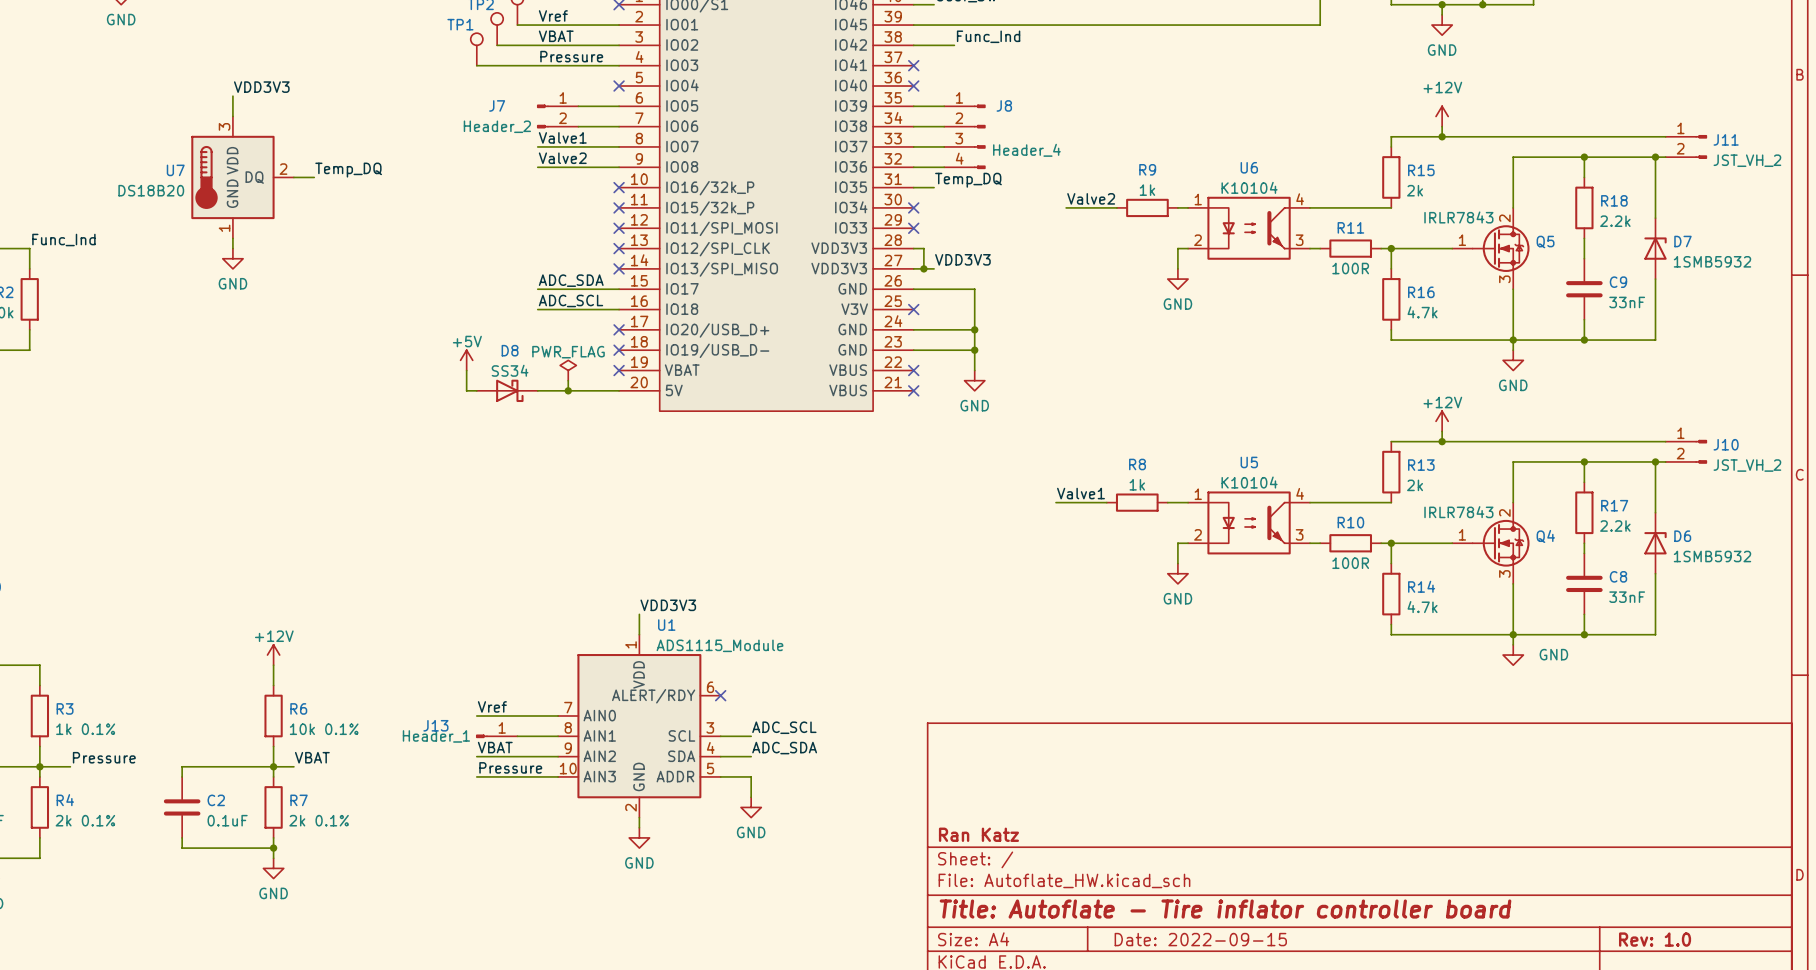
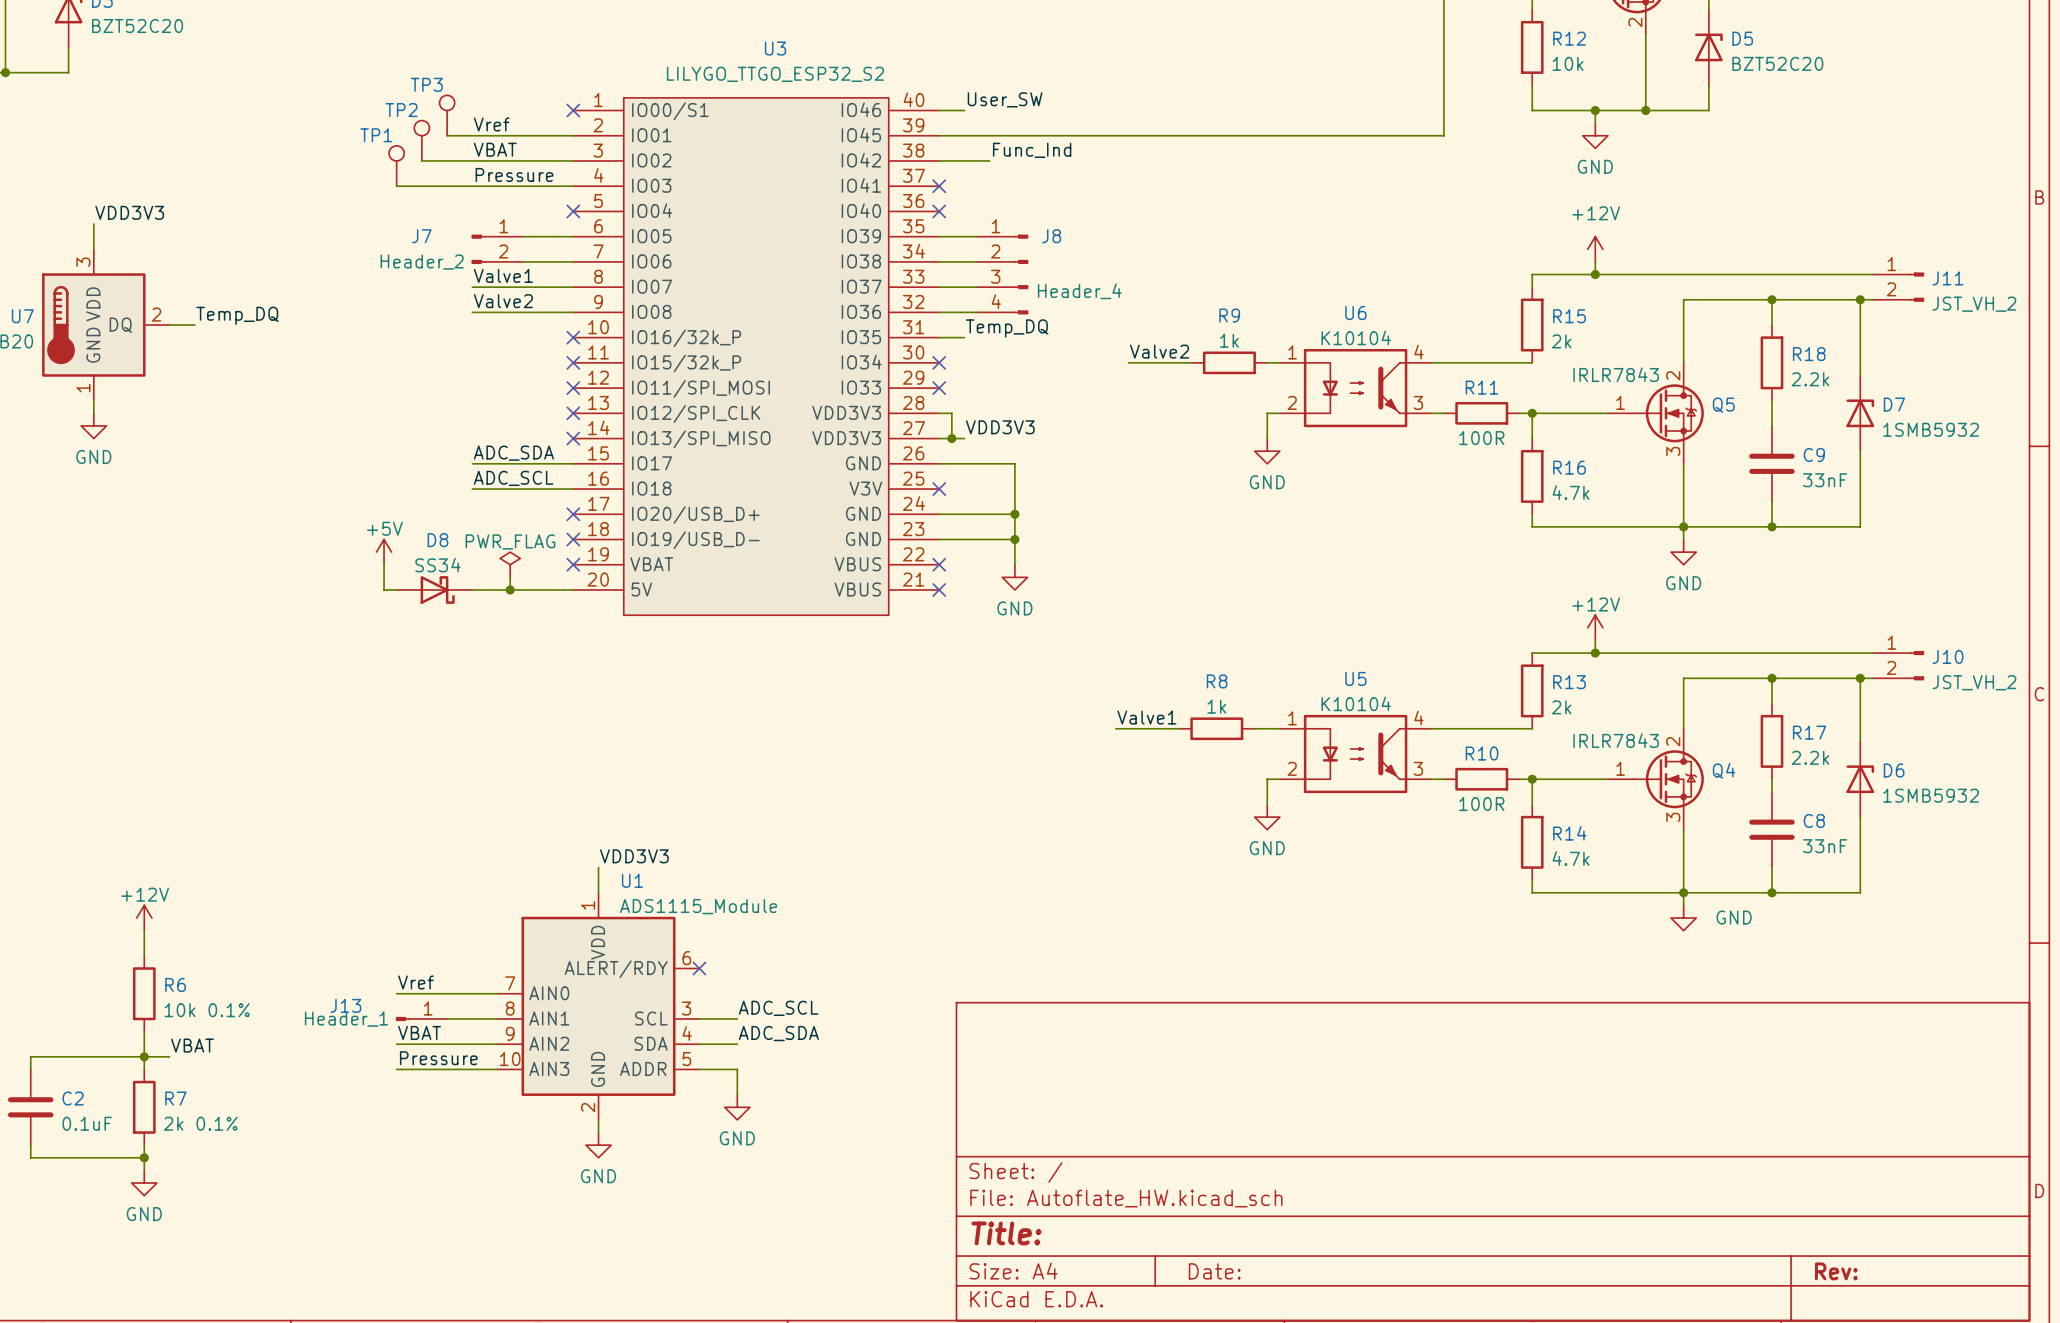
title block: Ran Katz (978, 834) -> none
title block: Title: Autoflate - Tire inflator controller board (1225, 909) -> Title: (1006, 1233)
title block: Date: 2022-09-15 (1200, 939) -> Date: (1214, 1271)
title block: Rev: 1.0 (1655, 939) -> Rev: (1836, 1271)

